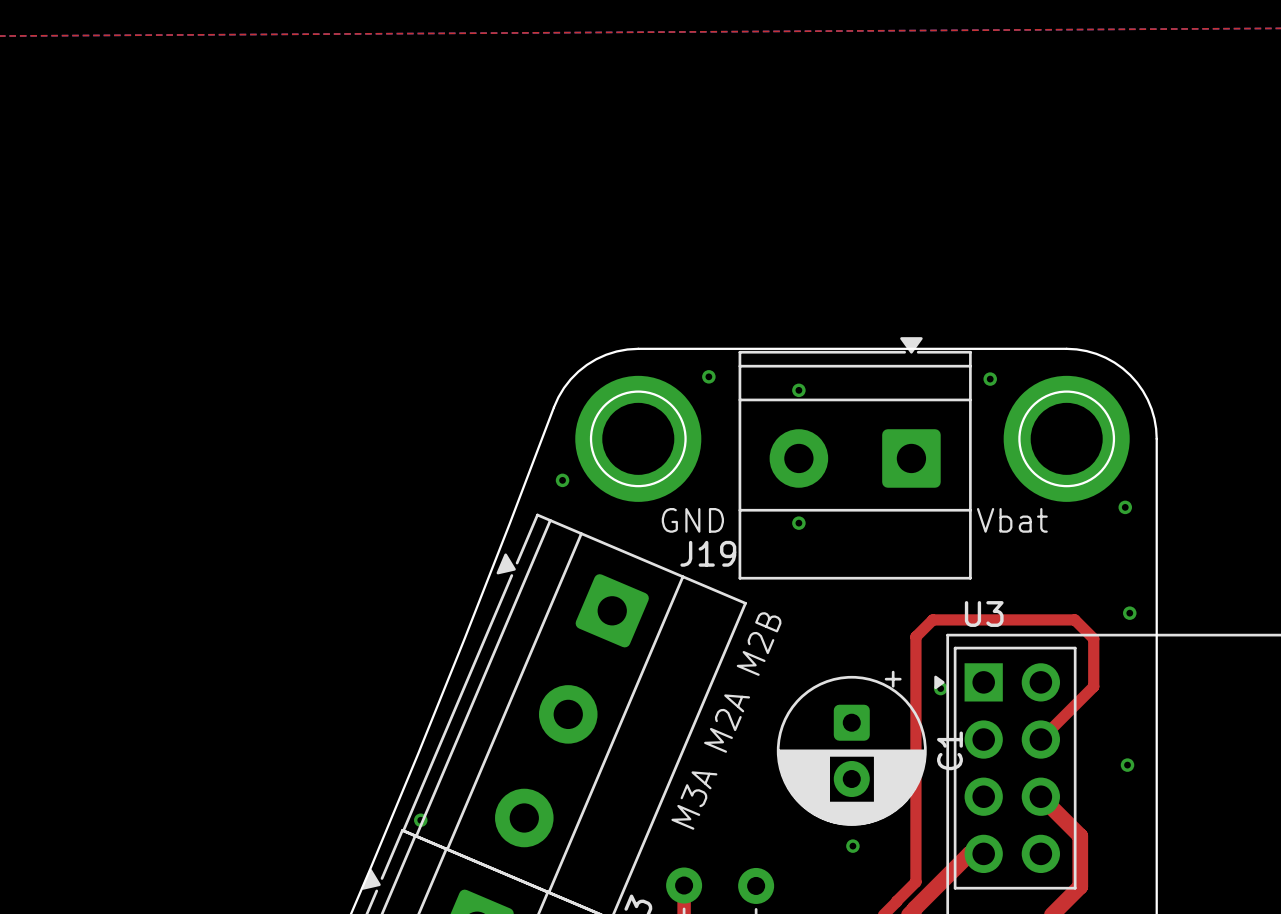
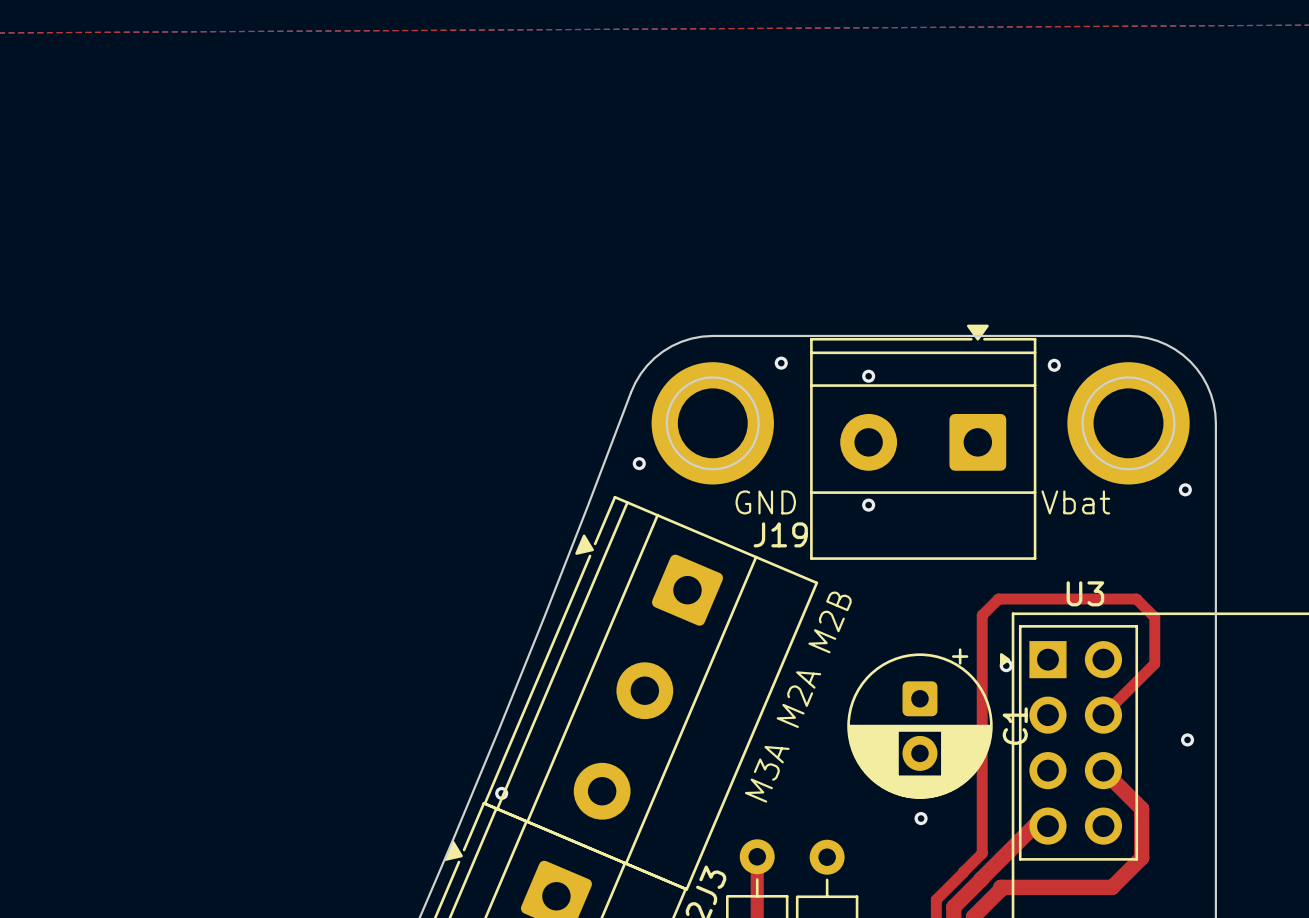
via: (1129, 613) -> none
U3 name position: U3 (984, 614) -> U3 (1085, 593)

